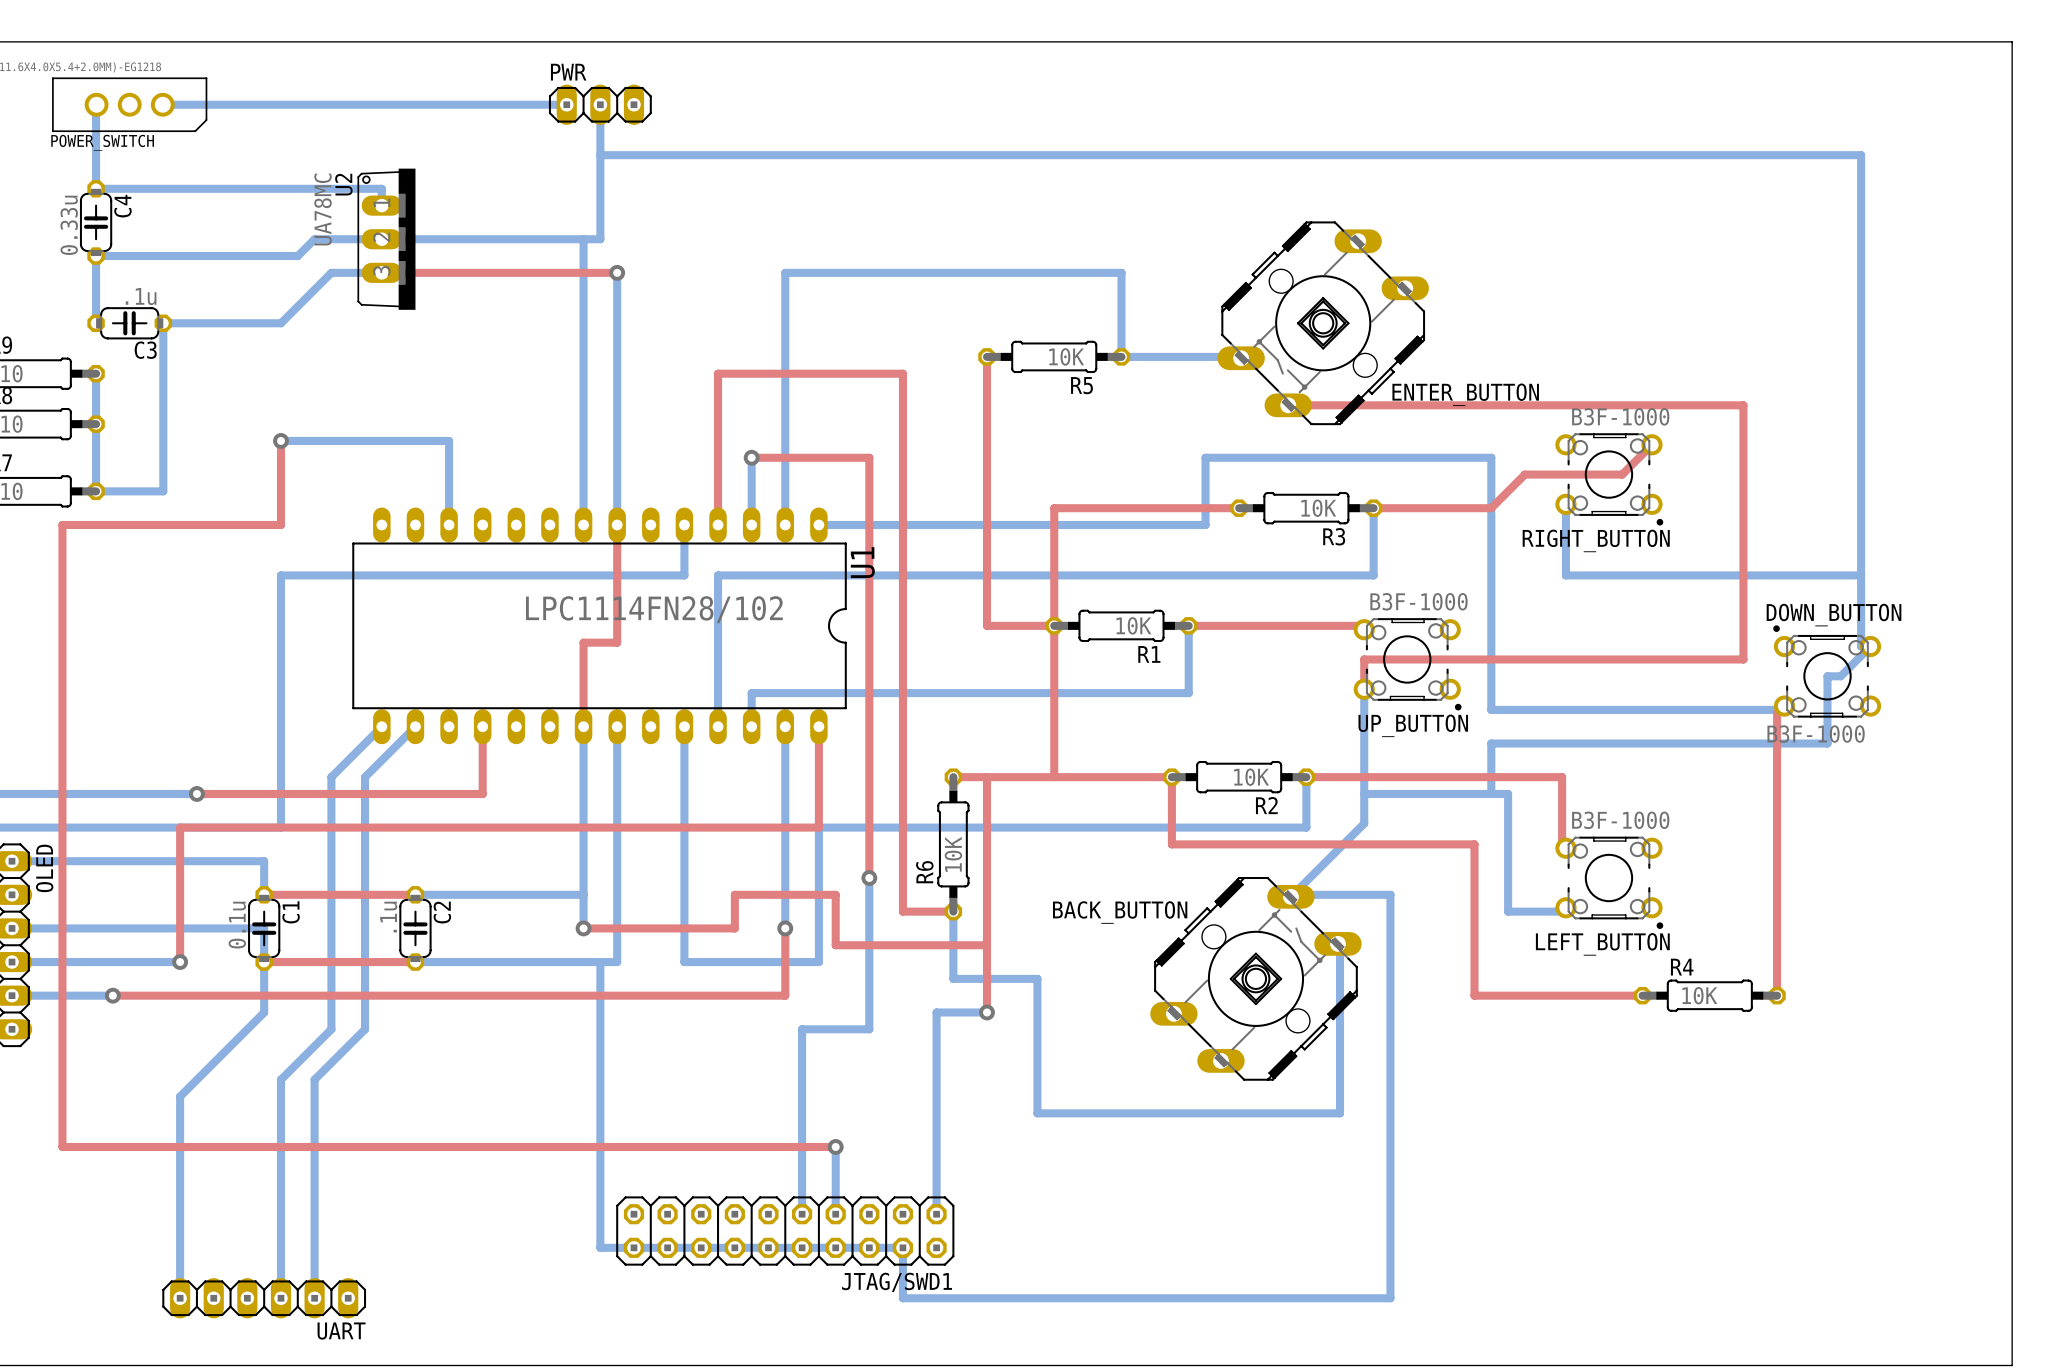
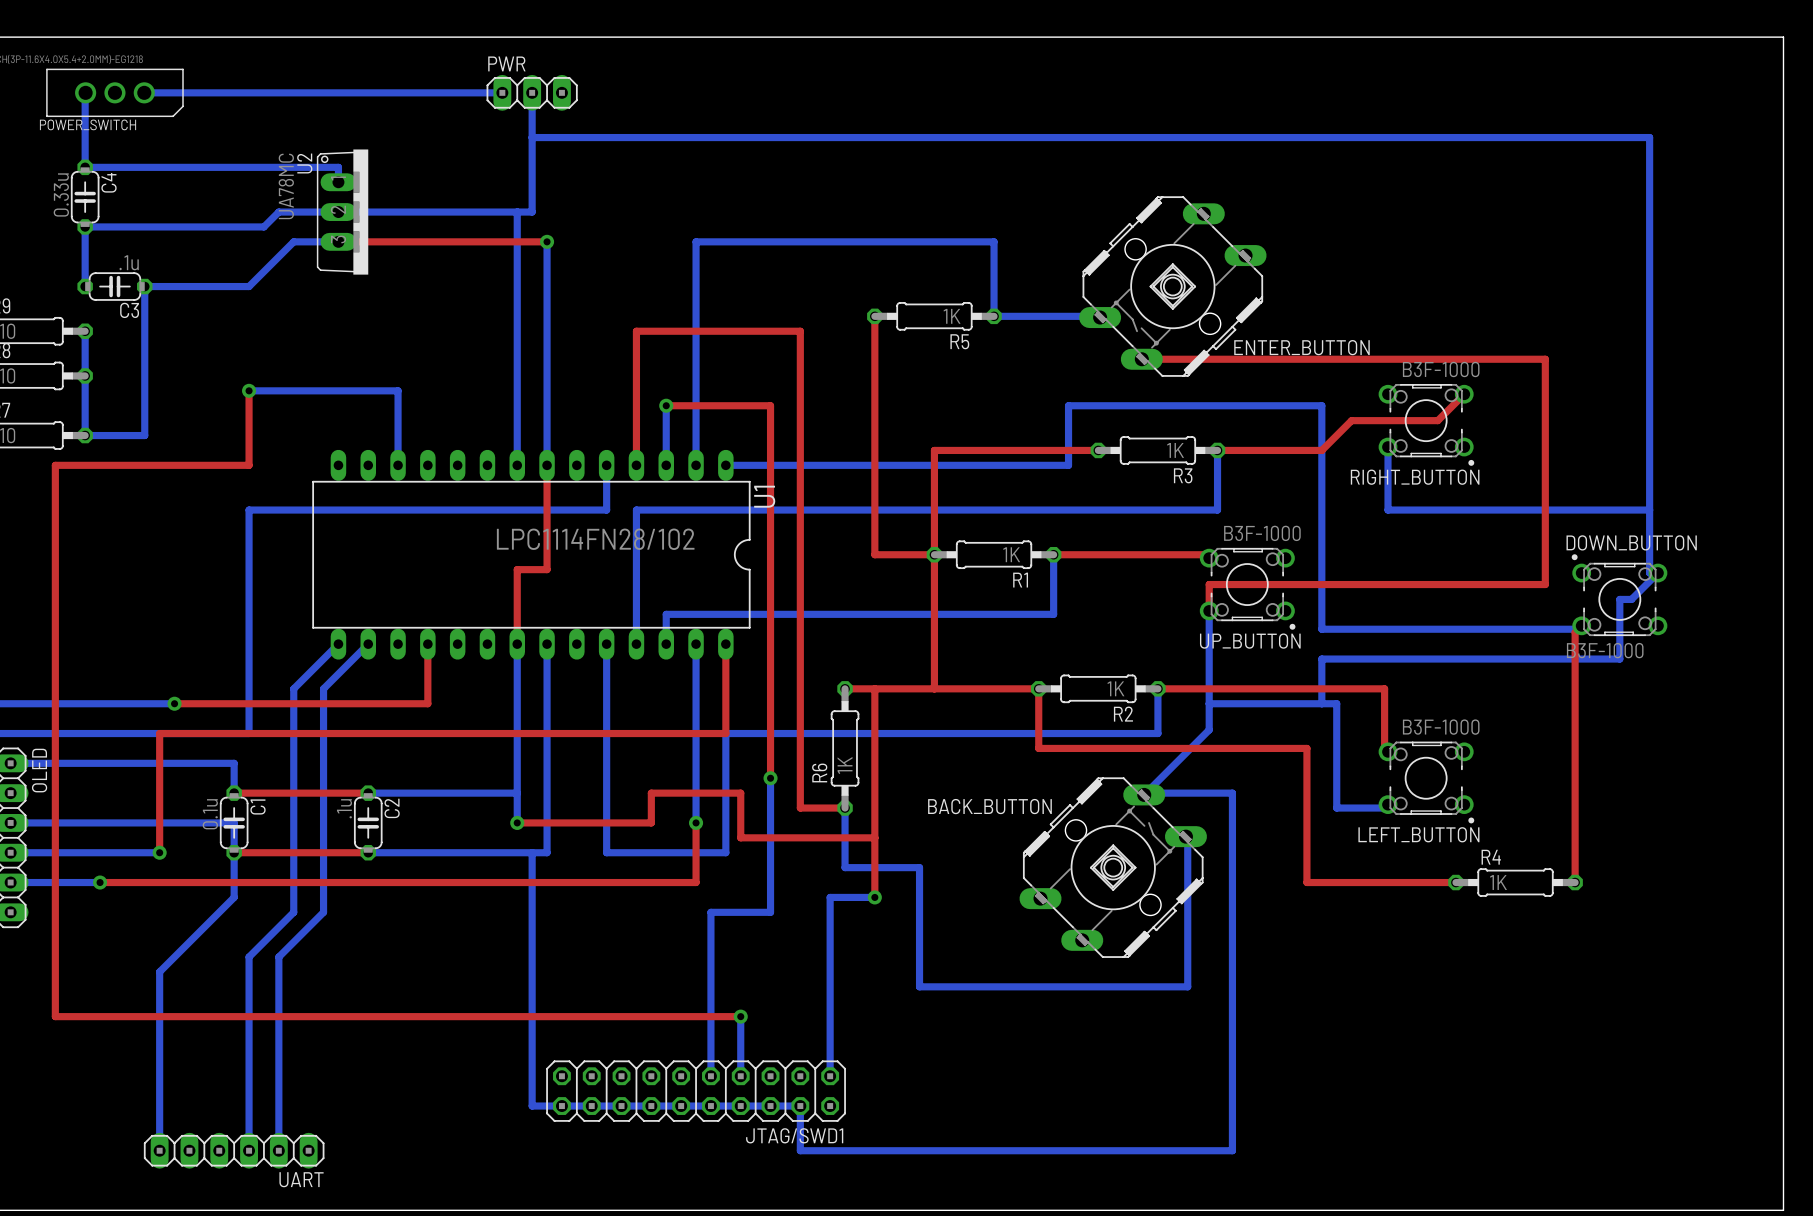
R5 value: 10K (1066, 356) -> 1K (952, 316)
R3 value: 10K (1318, 508) -> 1K (1175, 450)
R1 value: 10K (1133, 625) -> 1K (1011, 554)
R2 value: 10K (1251, 777) -> 1K (1115, 688)
R6 value: 10K (953, 854) -> 1K (845, 765)
R4 value: 10K (1699, 995) -> 1K (1498, 882)

